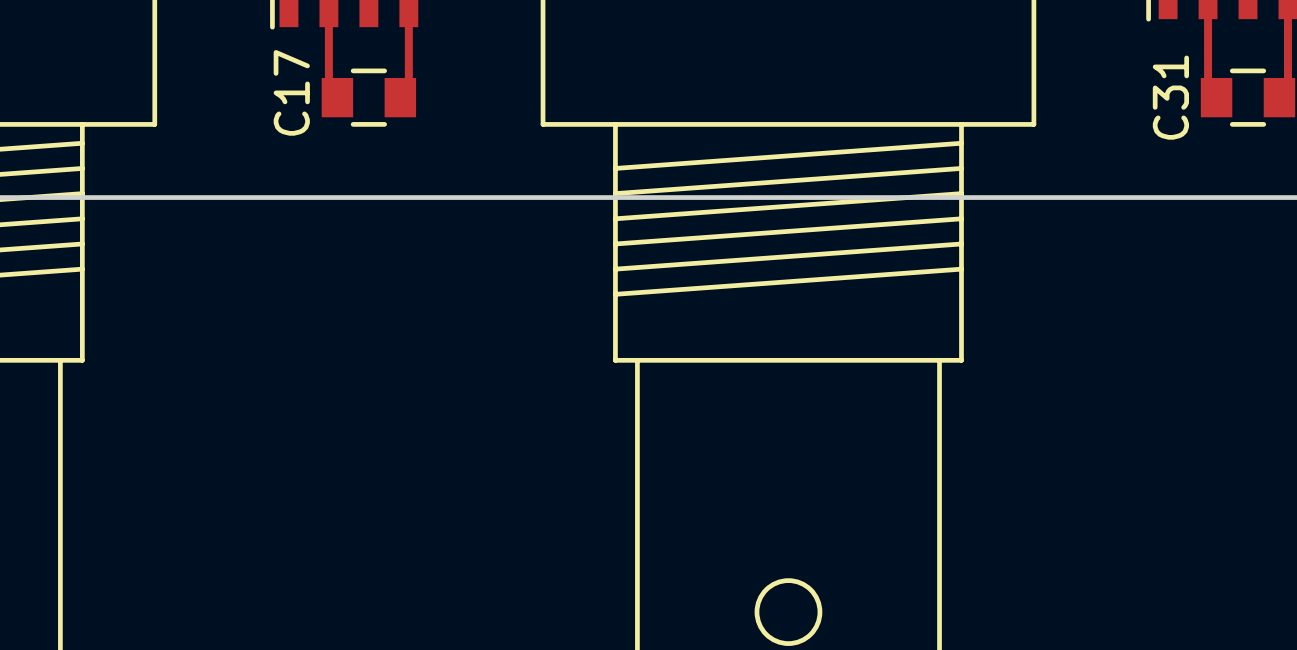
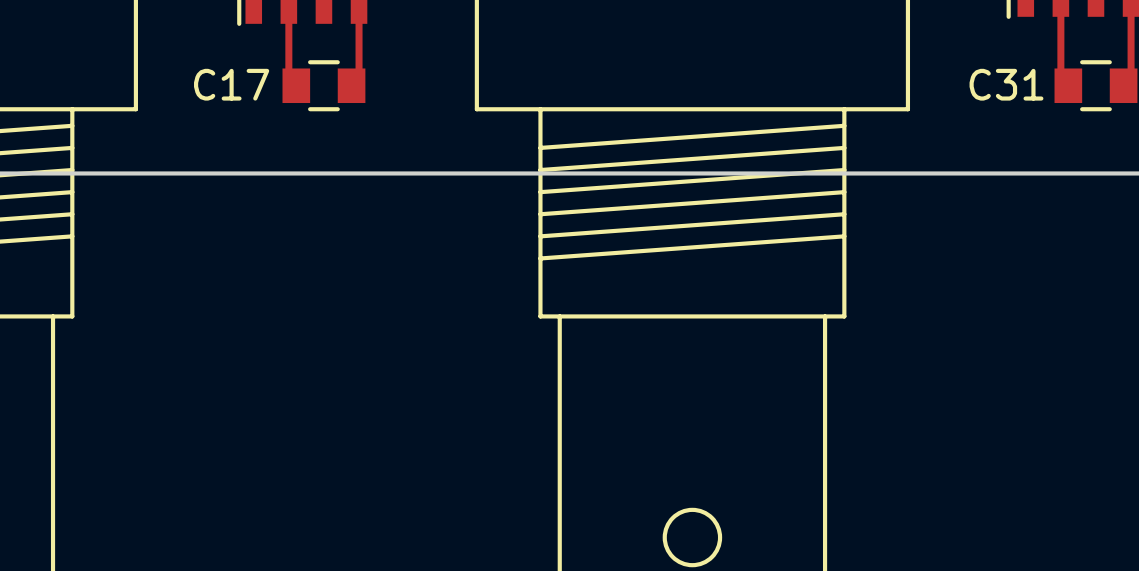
C17 name rotation: 0° (291, 92) -> 90° clockwise (231, 84)
C31 name rotation: 0° (1170, 97) -> 90° clockwise (1006, 84)

